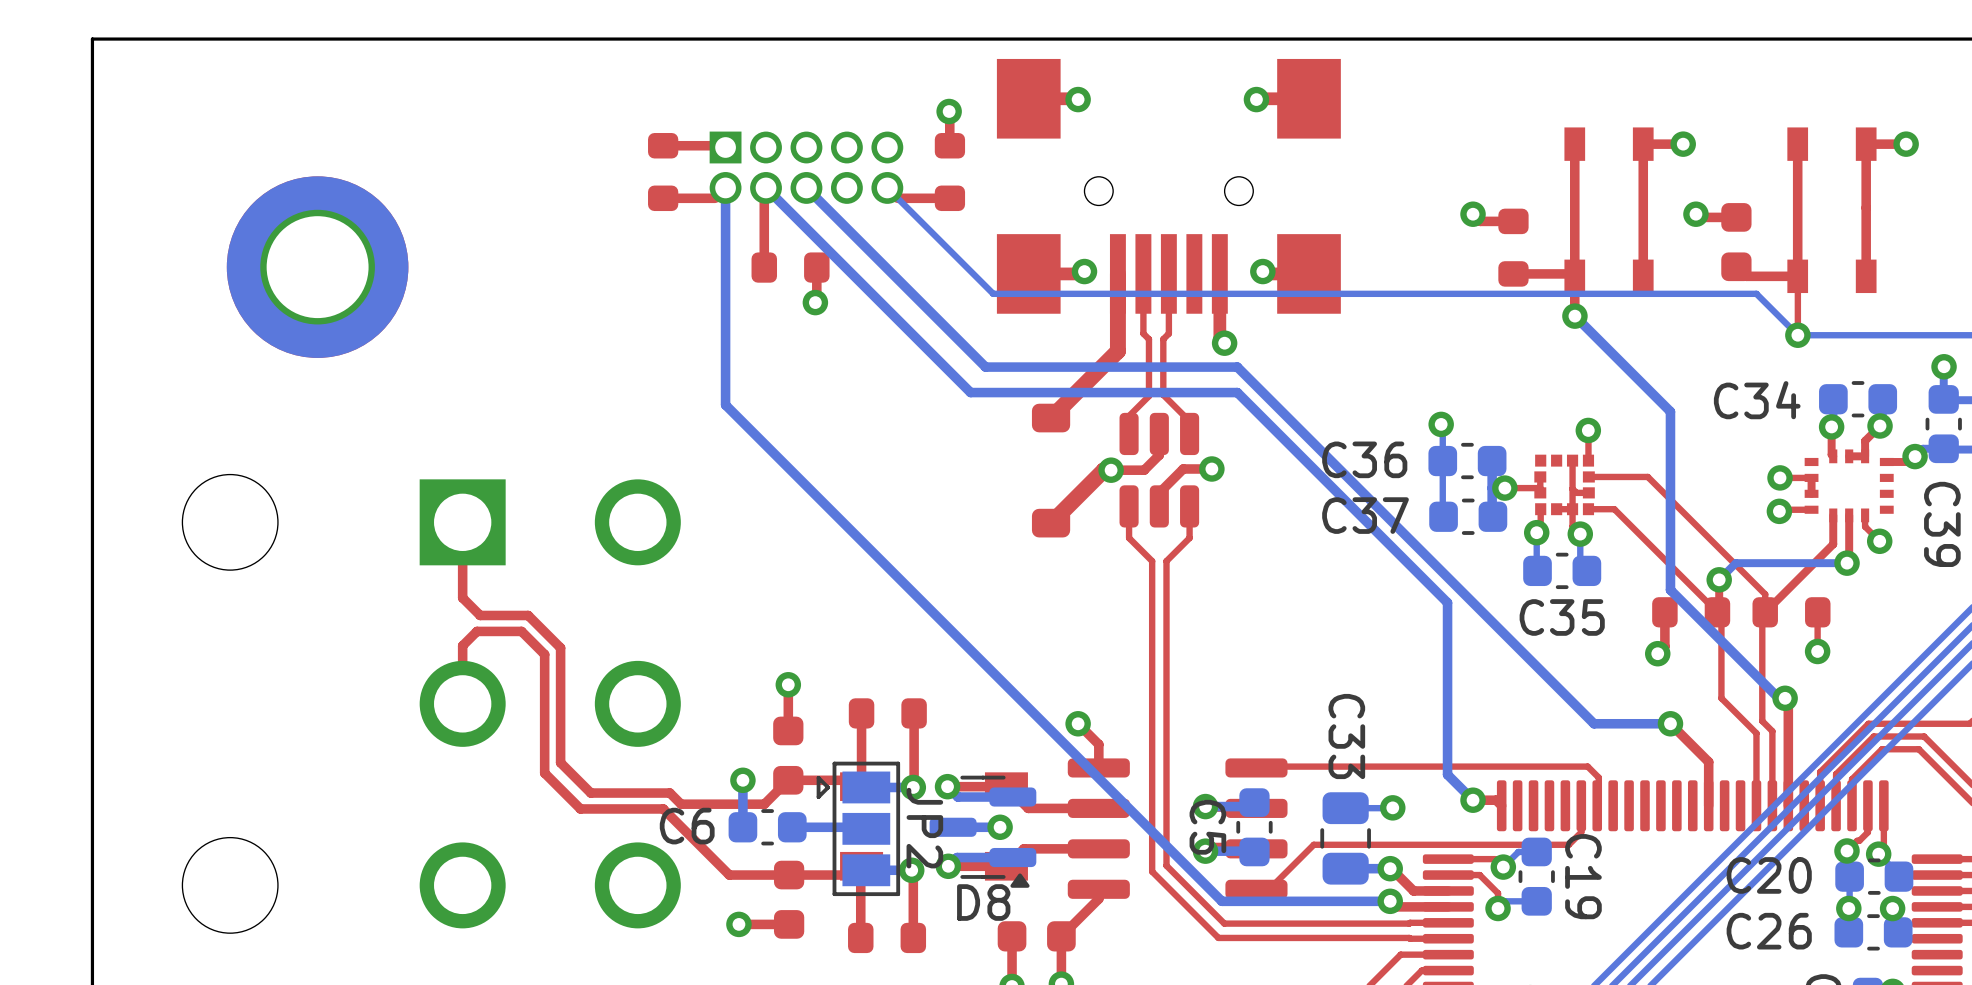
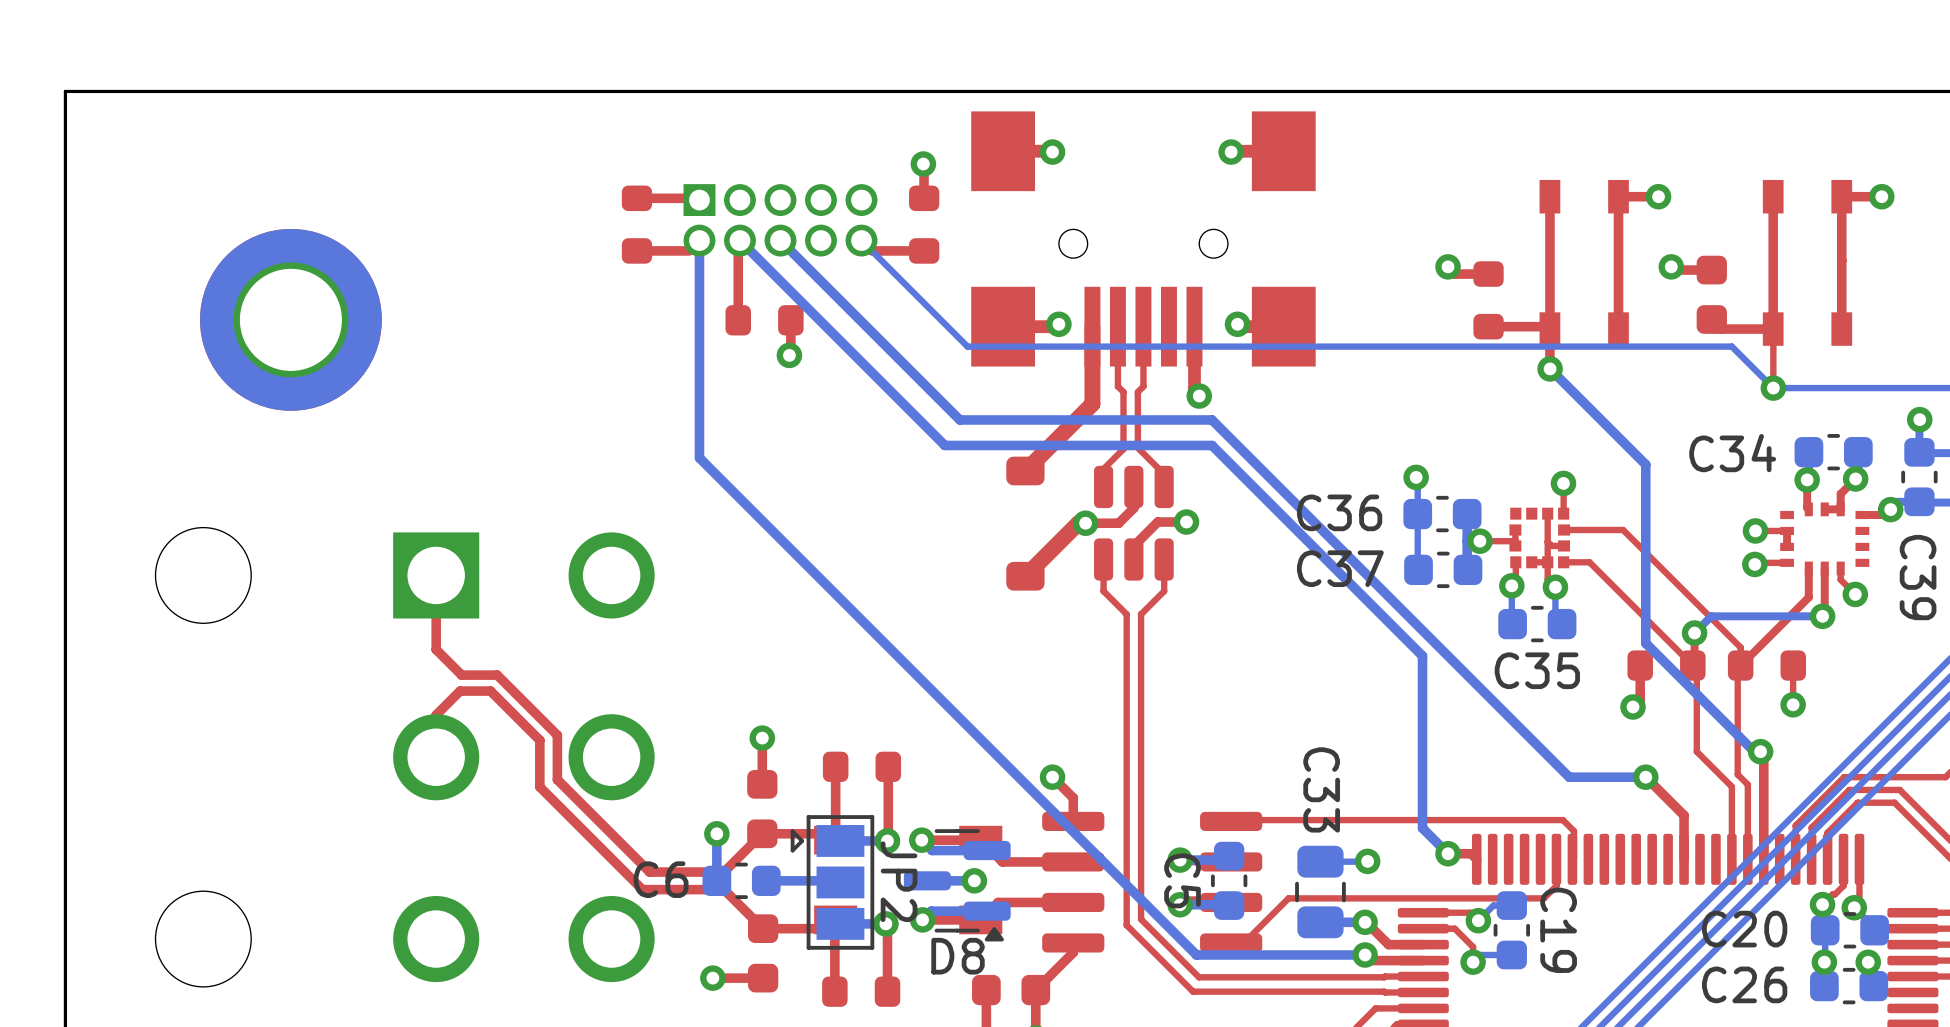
top track: (462, 596) (480, 615) (528, 615) (560, 647) (560, 762) (590, 793) (669, 793) (681, 804) (764, 804) -> (436, 649) (461, 675) (497, 675) (557, 735) (557, 779) (649, 872) (724, 872) (738, 857)
top track: (462, 661) (462, 645) (477, 631) (521, 631) (544, 654) (544, 773) (580, 808) (663, 808) (729, 875) (789, 875) -> (436, 714) (460, 691) (490, 691) (539, 740) (539, 786) (642, 889) (724, 889) (763, 928)

